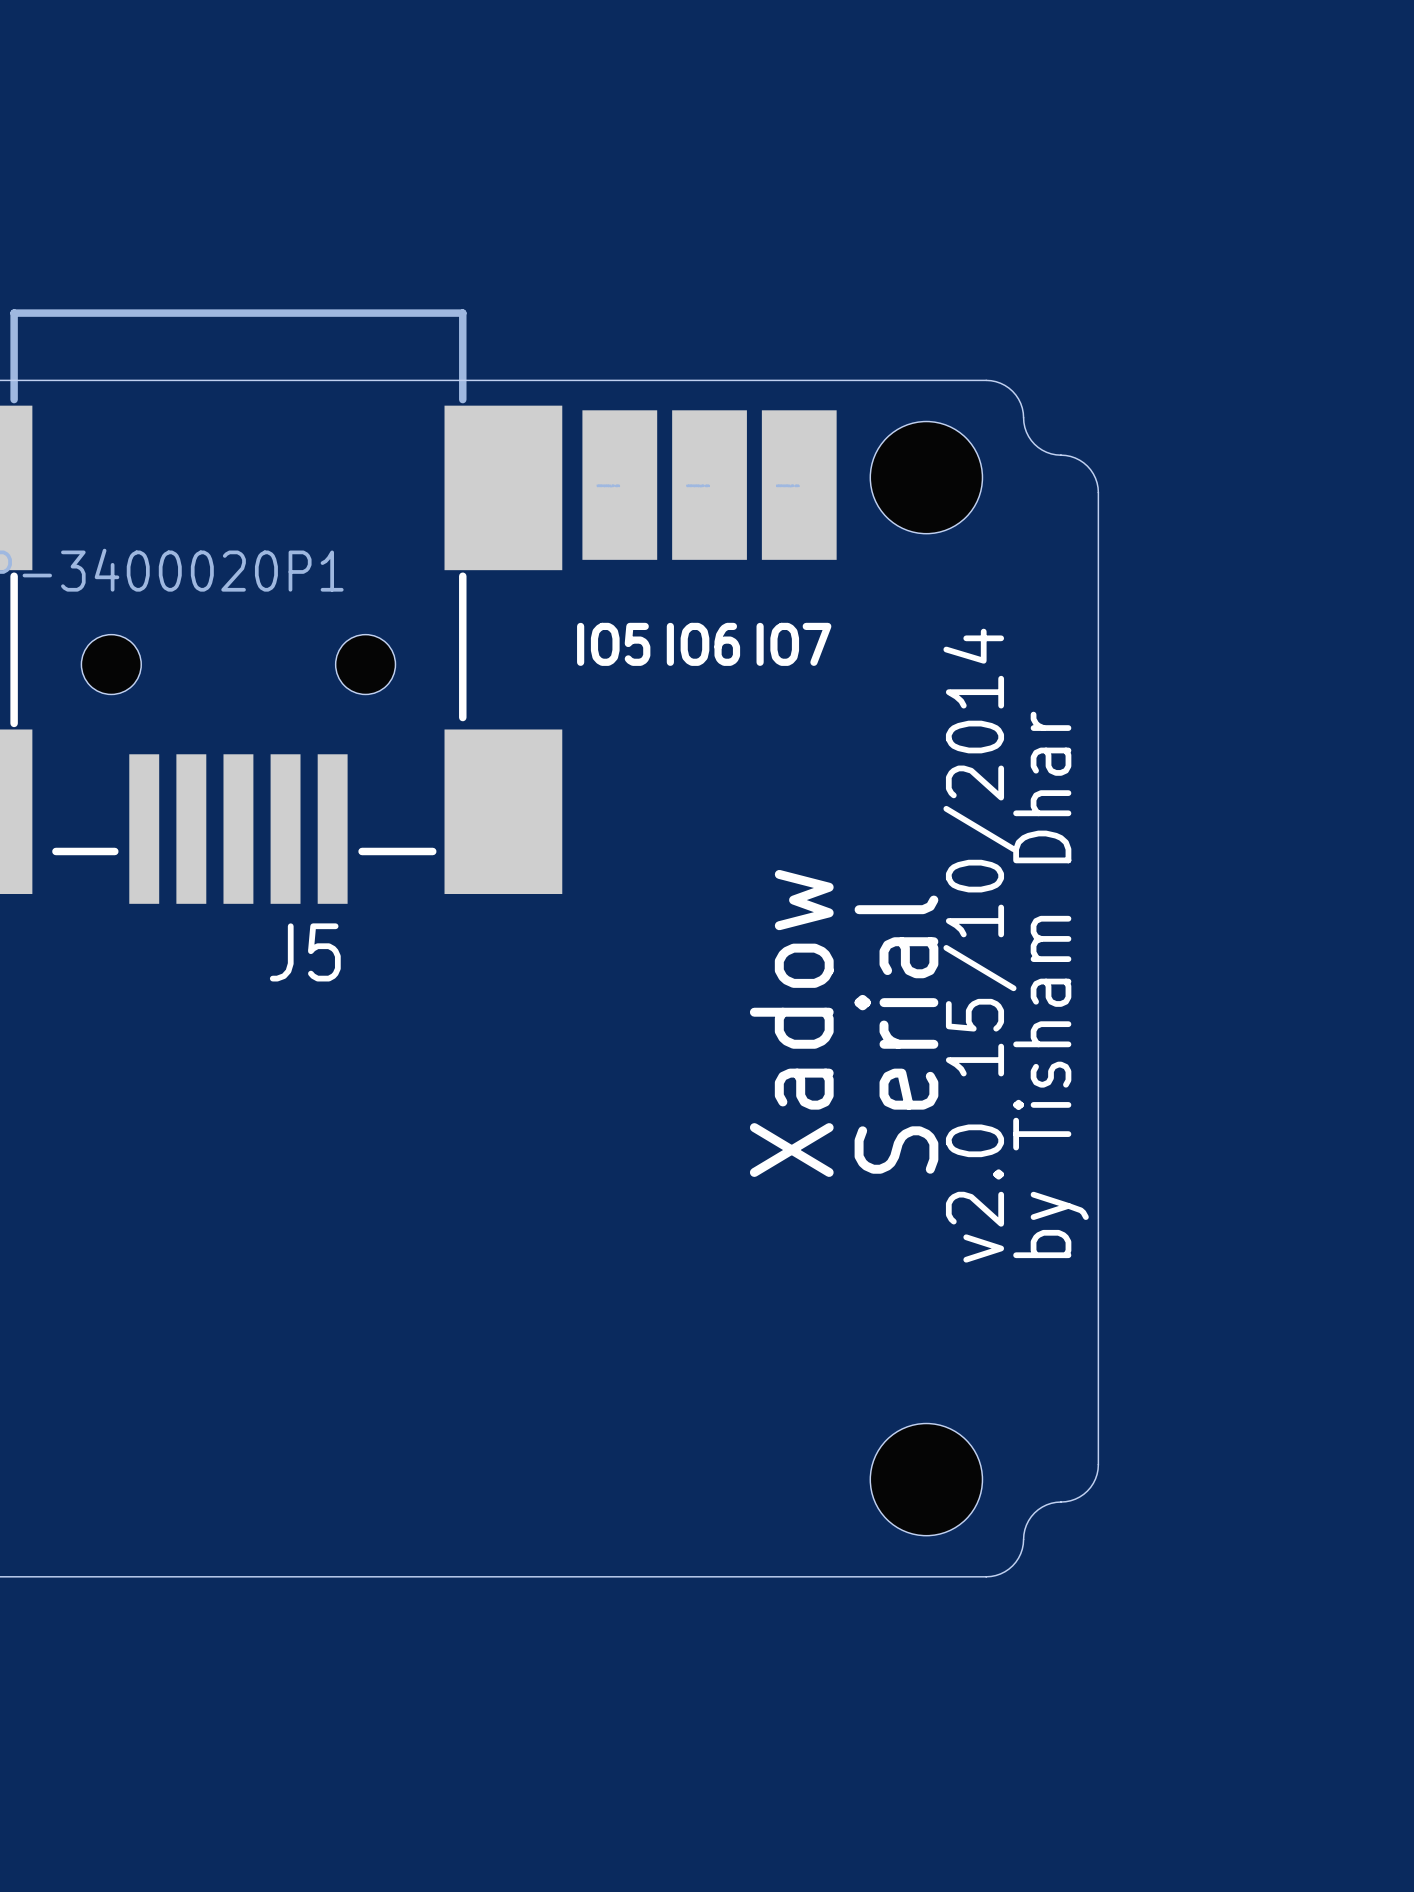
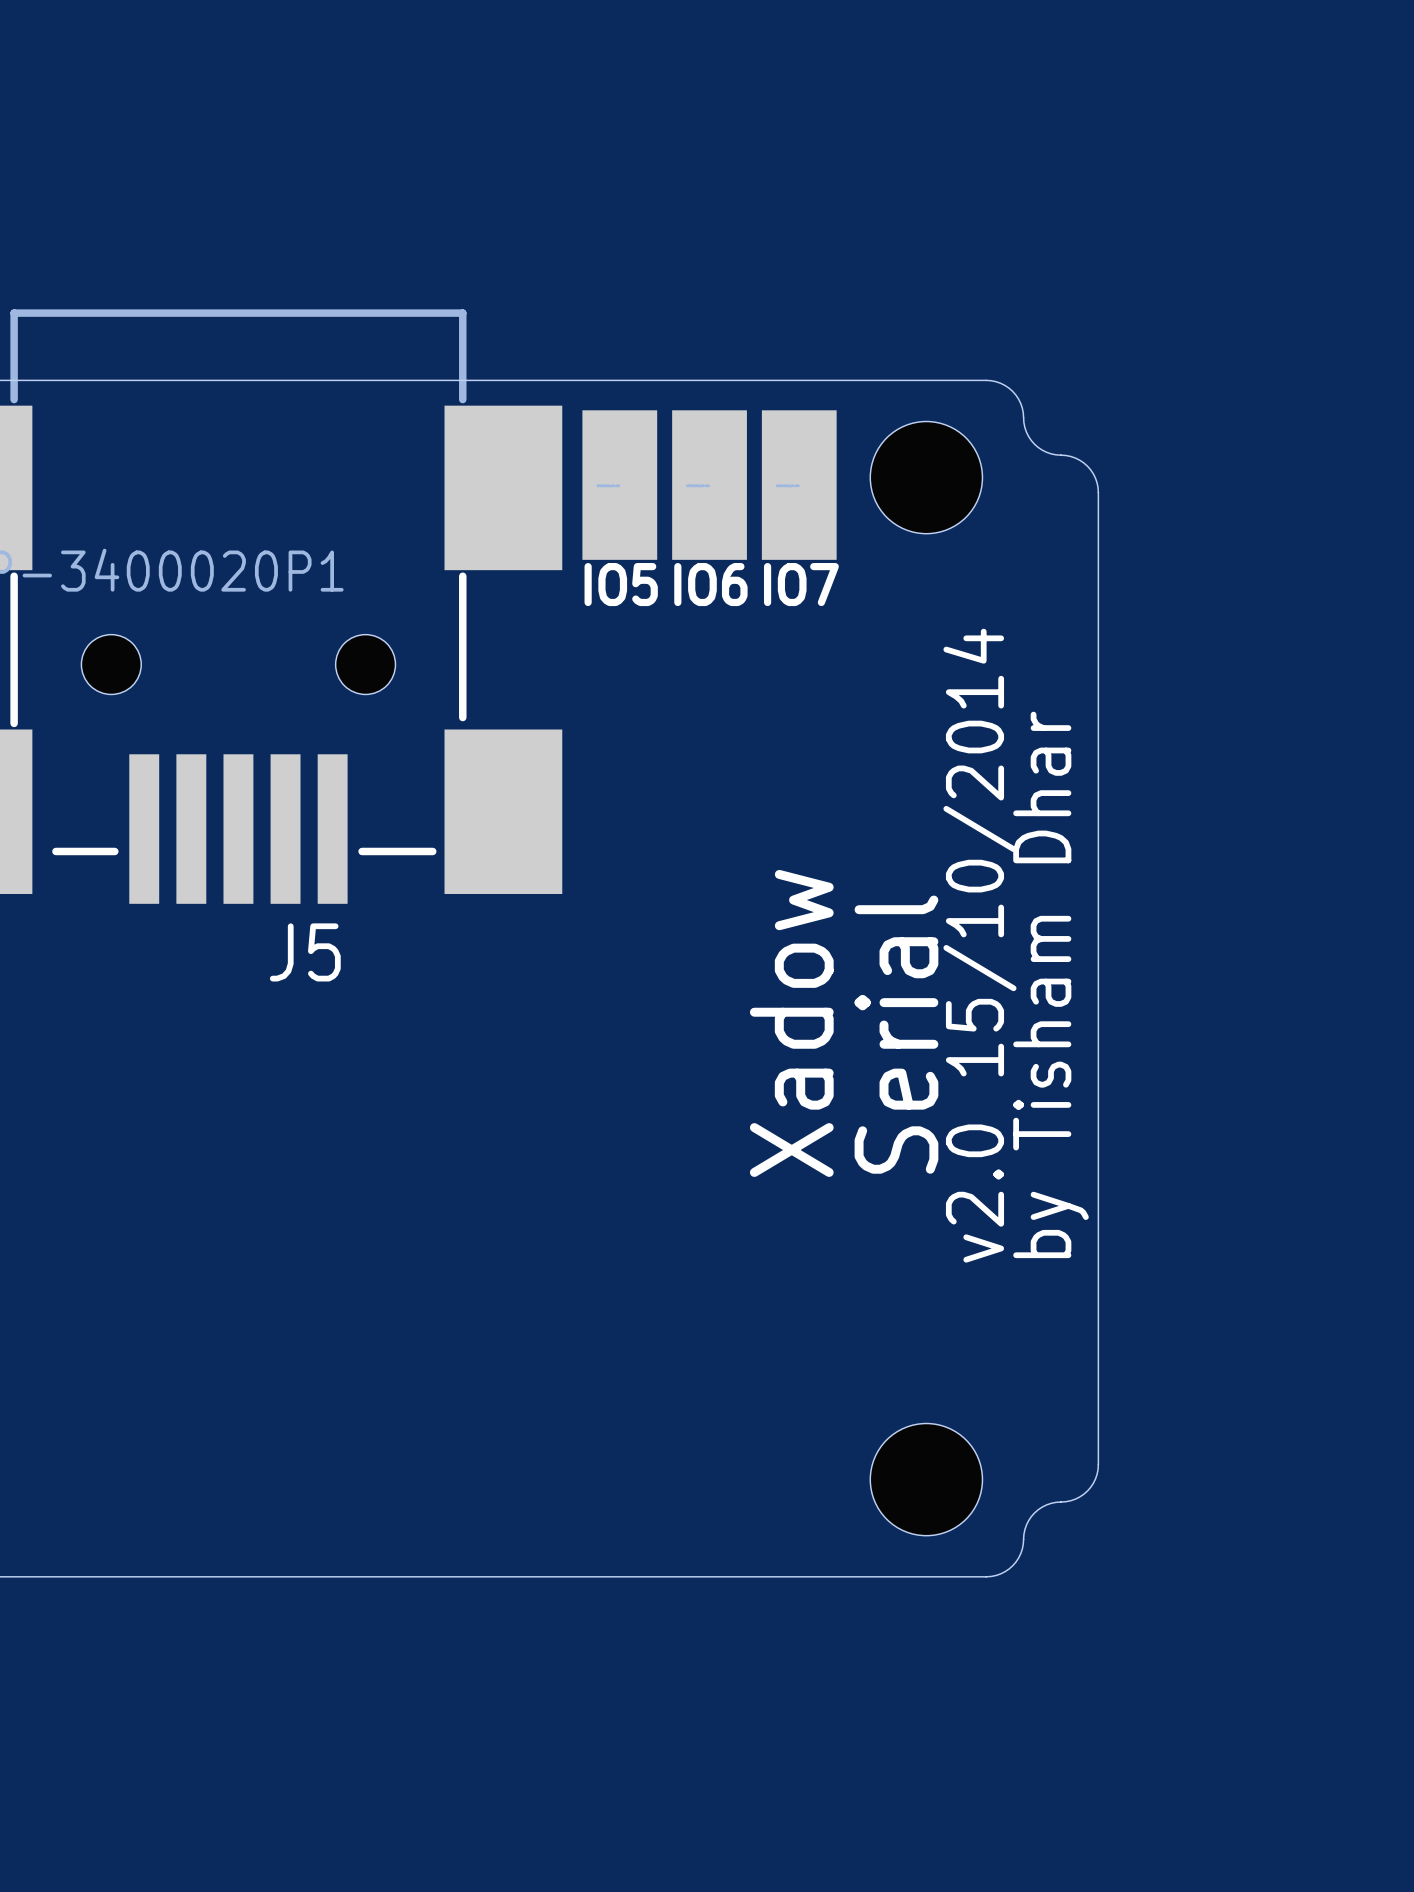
IO5 name position: IO5 (613, 644) -> IO5 (621, 584)
IO6 name position: IO6 (703, 644) -> IO6 (710, 584)
IO7 name position: IO7 (793, 644) -> IO7 (801, 584)

